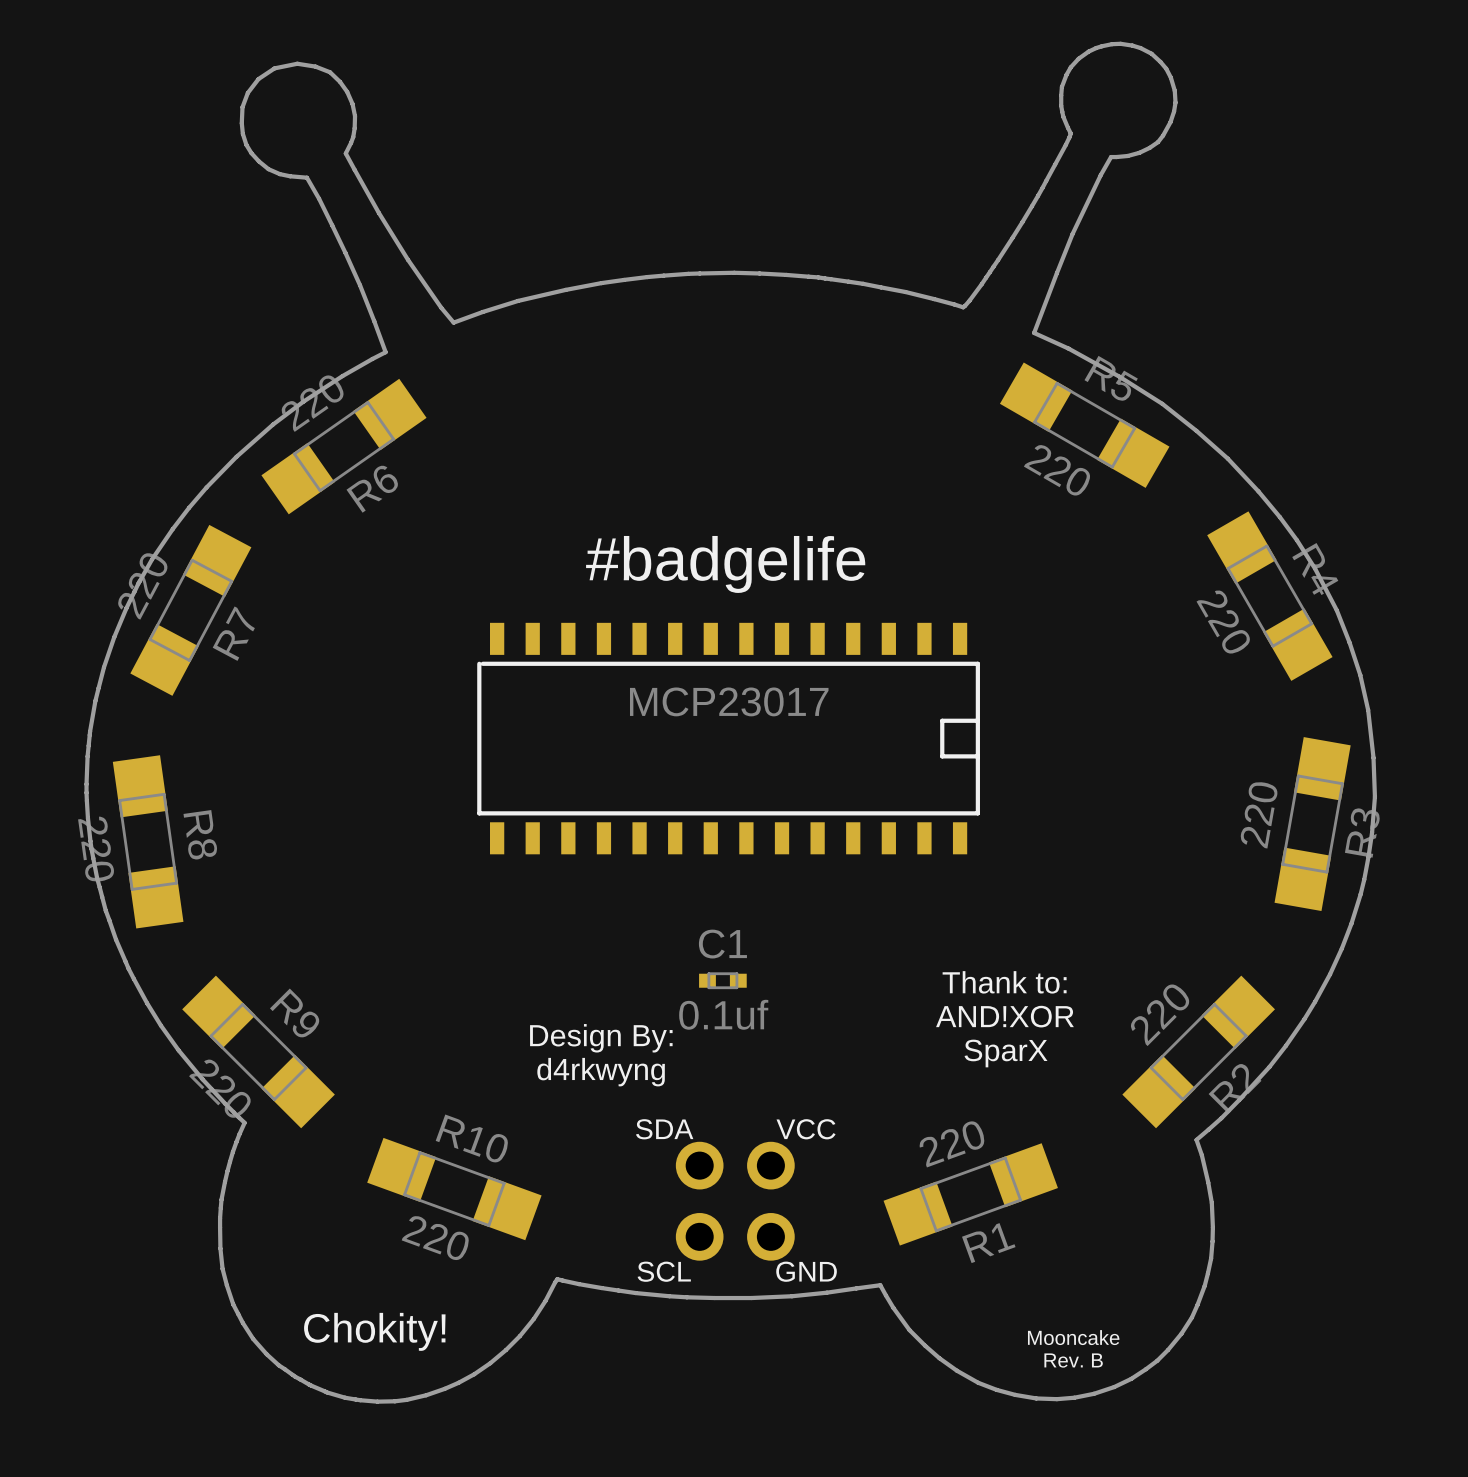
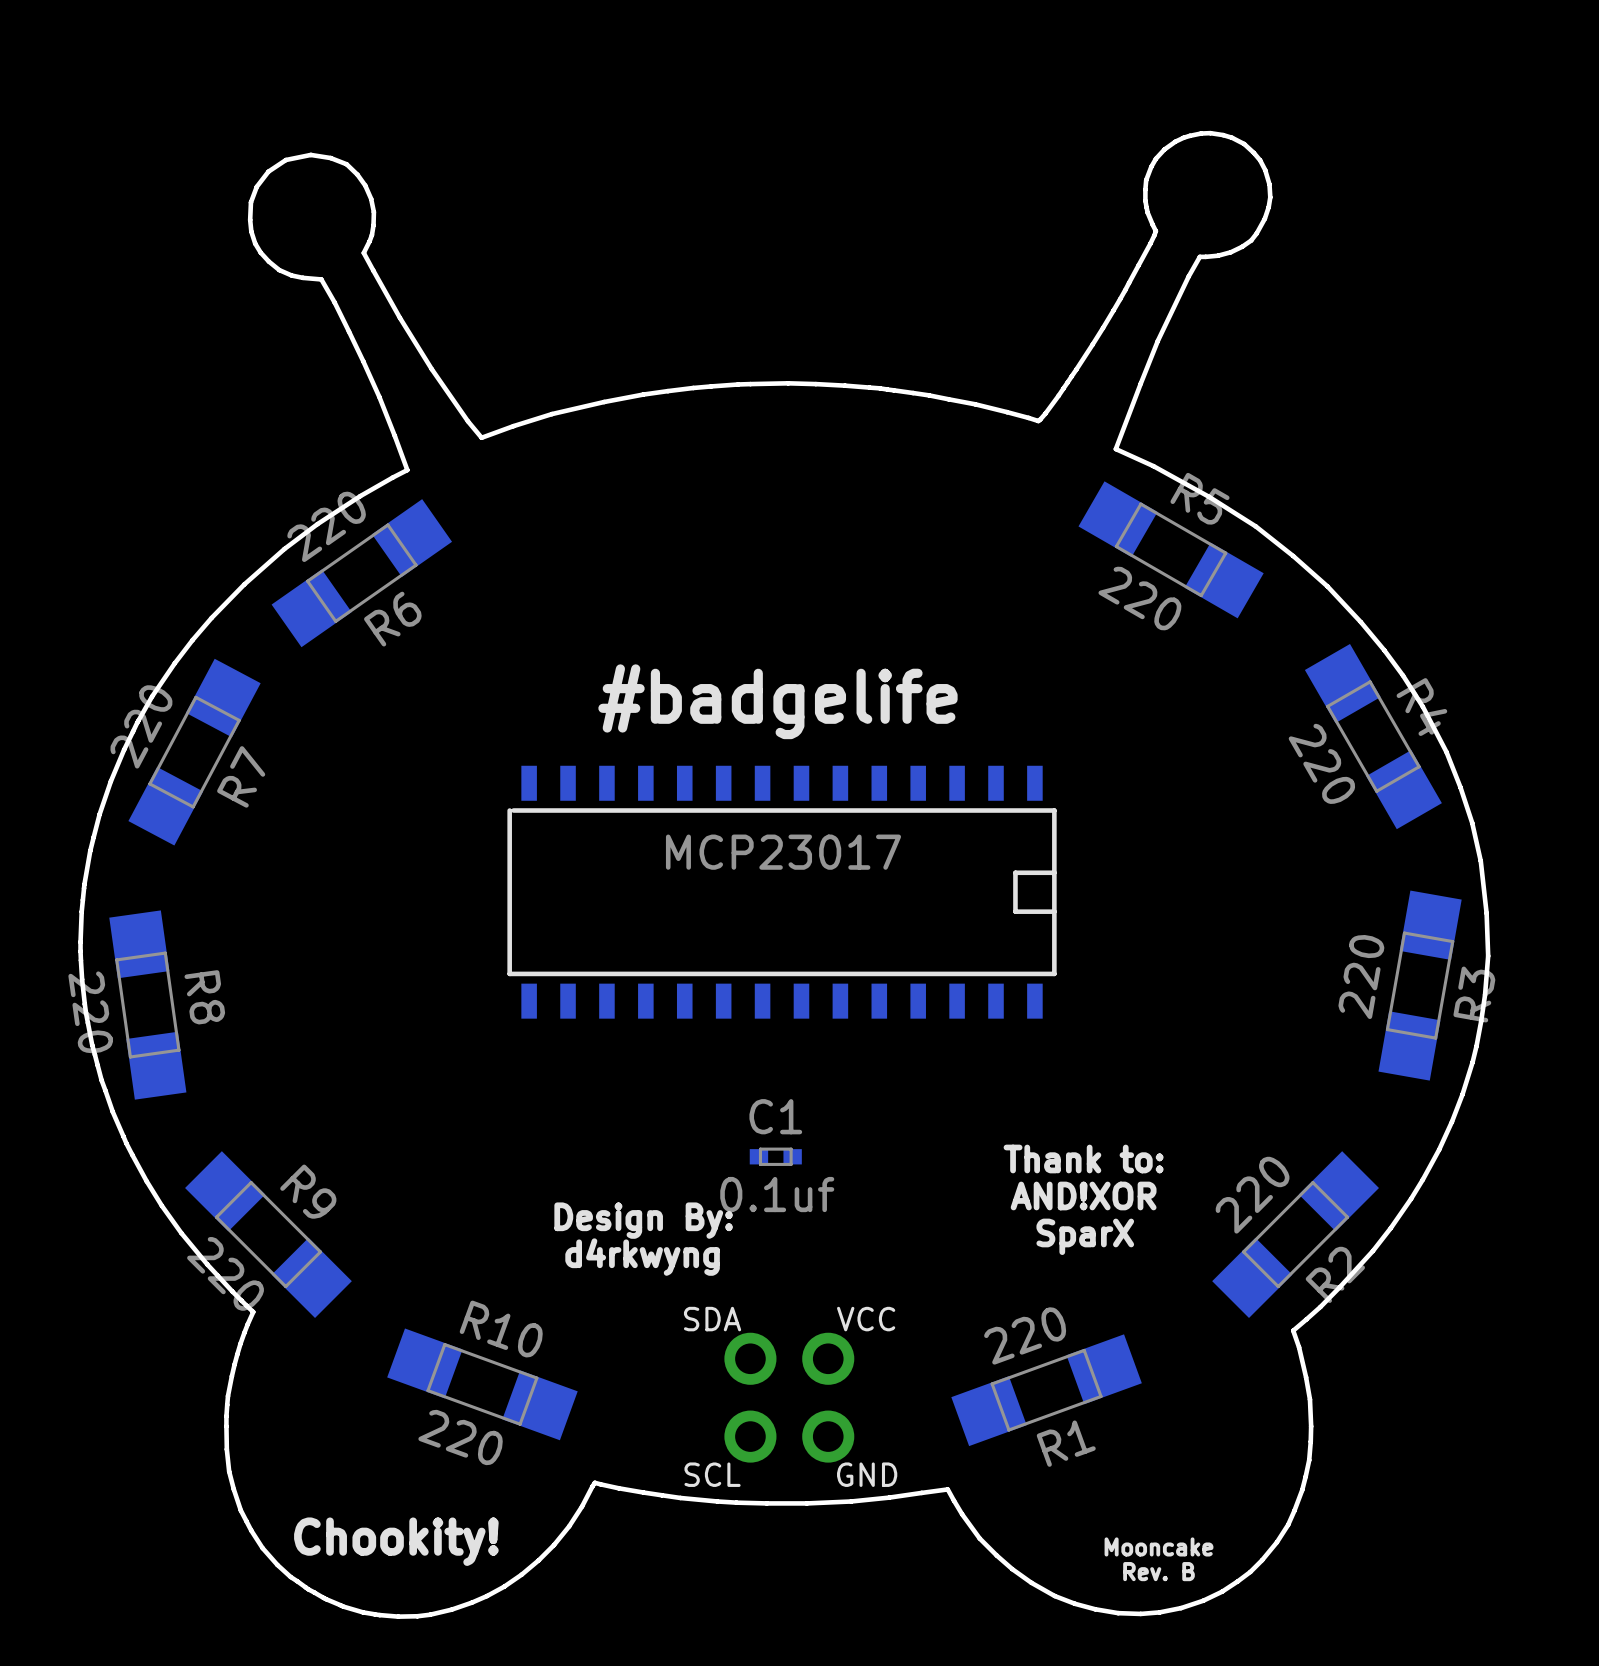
text: Chokity! (374, 1331) -> Chookity! (396, 1541)

